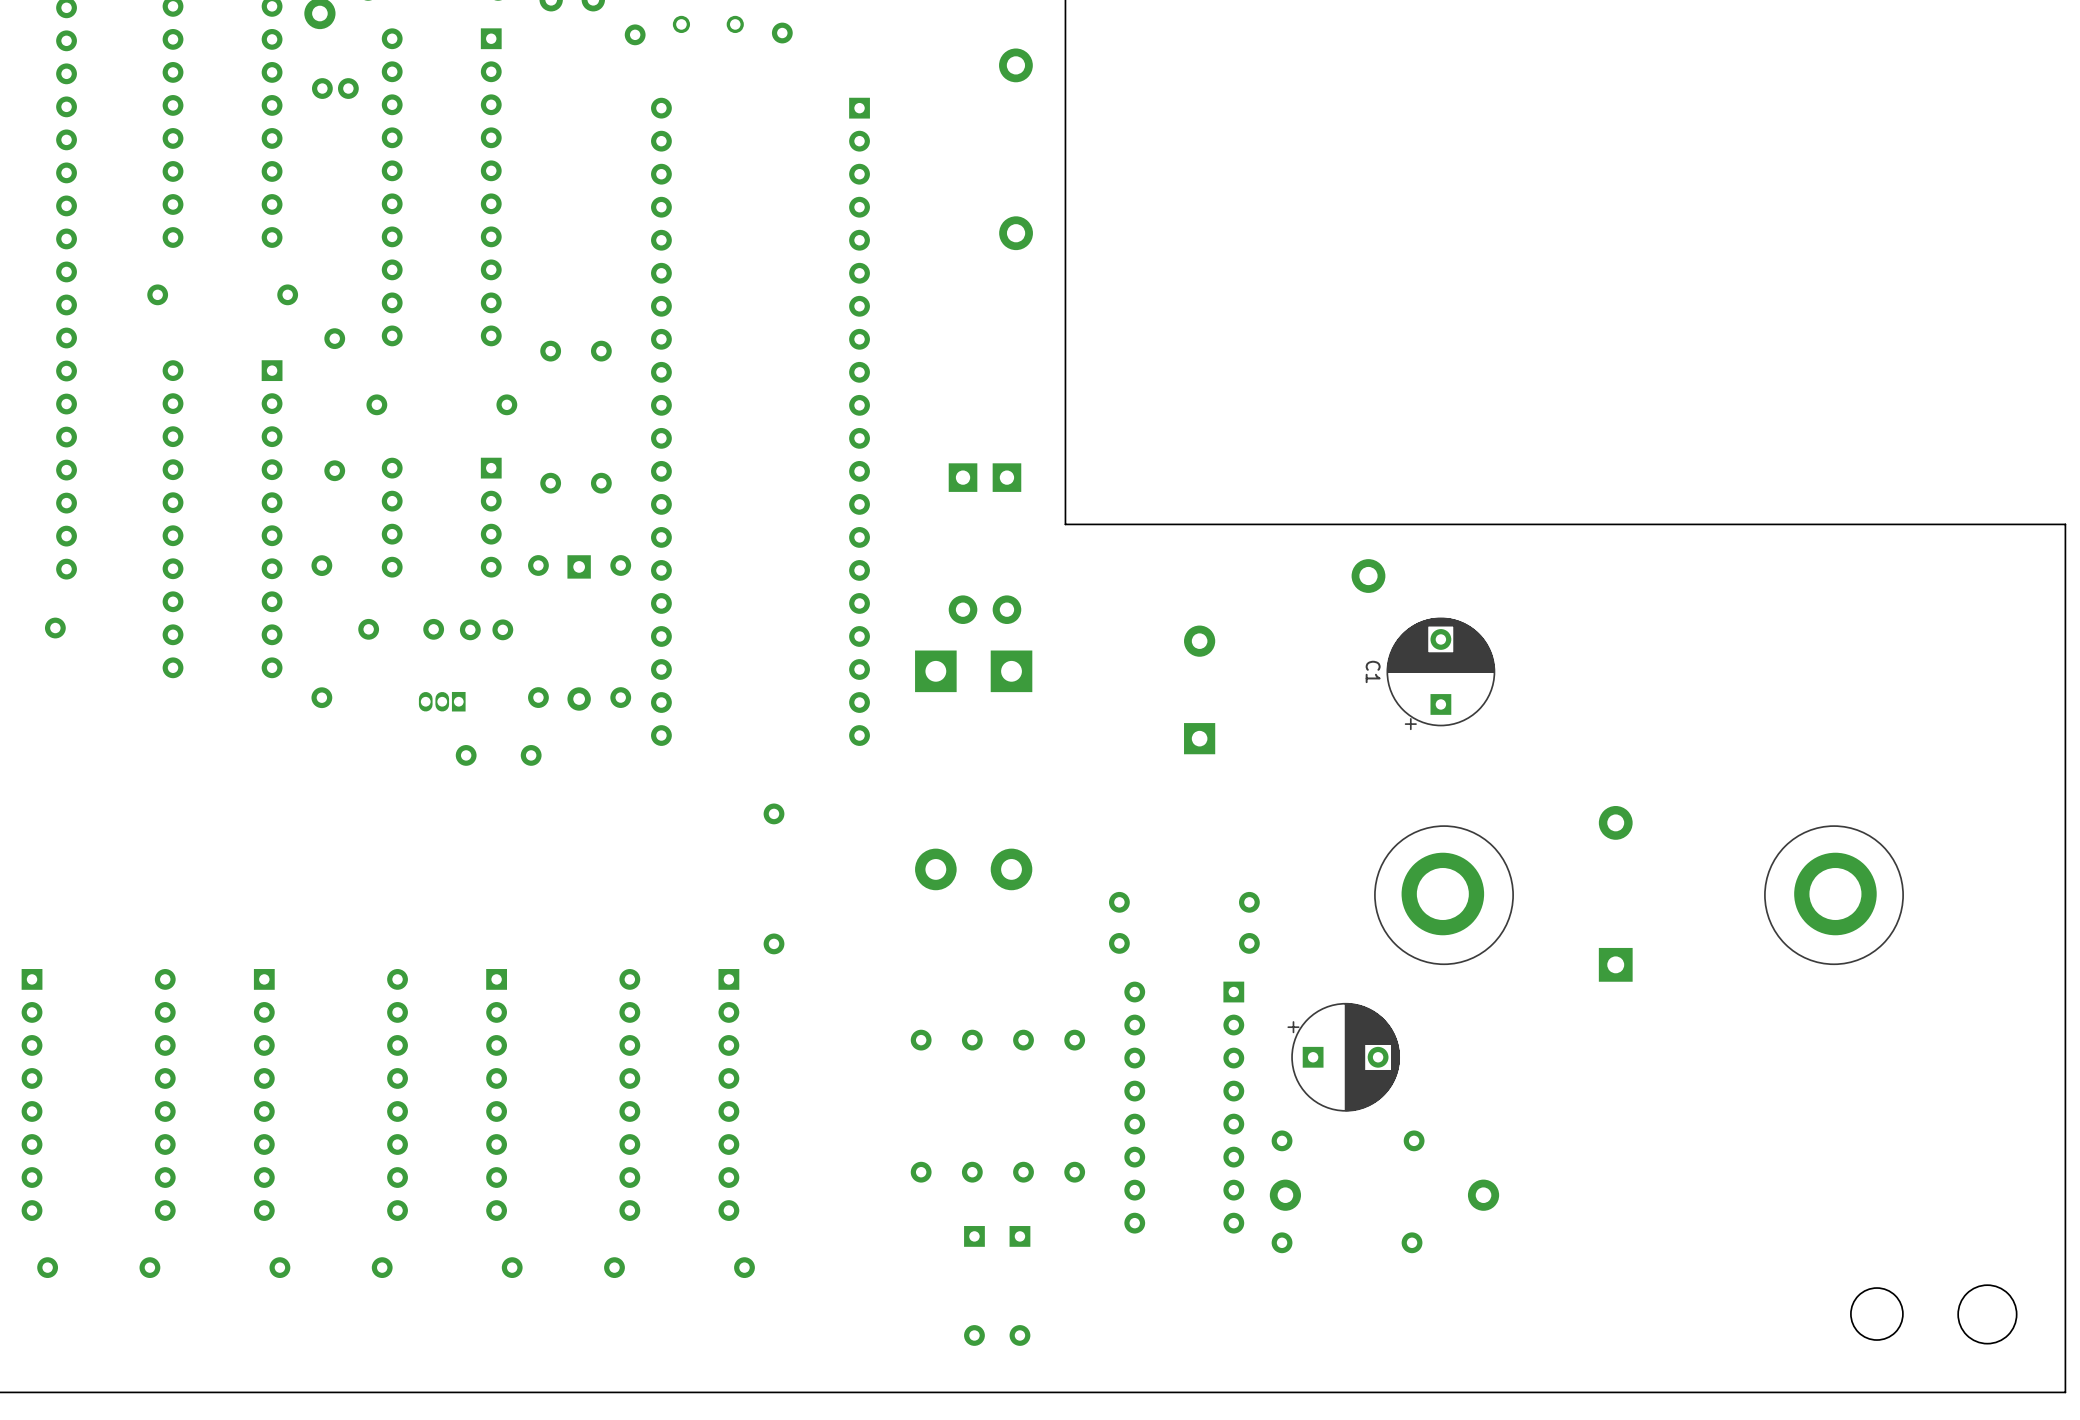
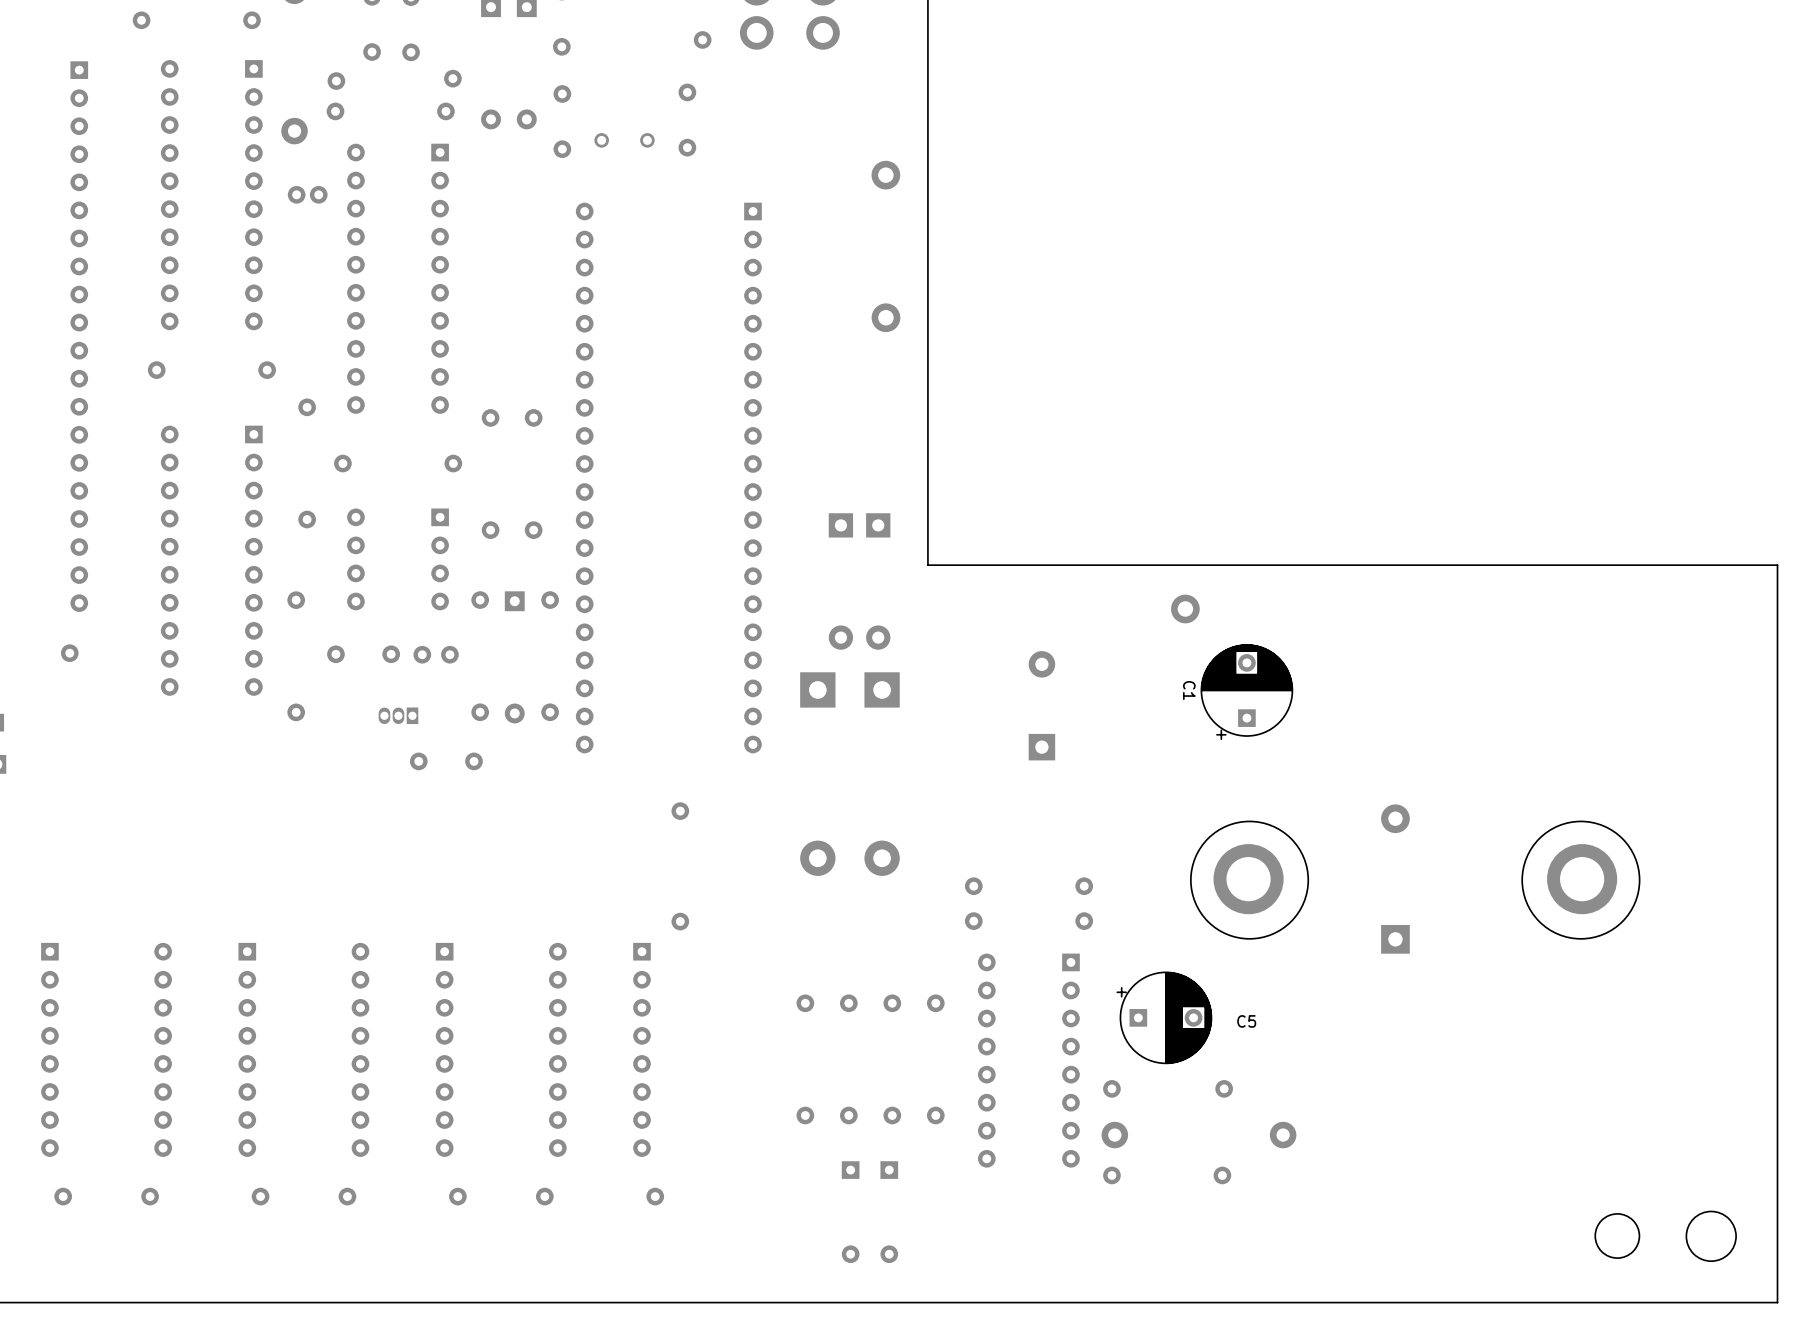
C5 name: none -> C5 (1246, 1021)

